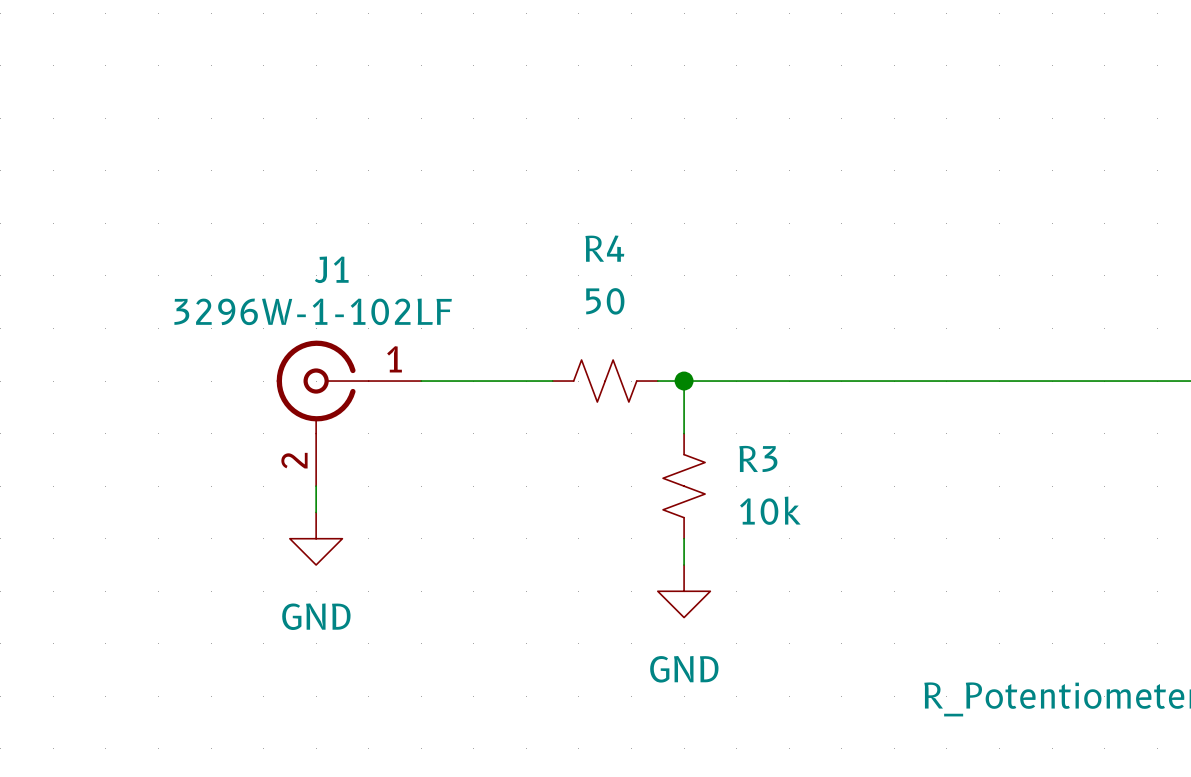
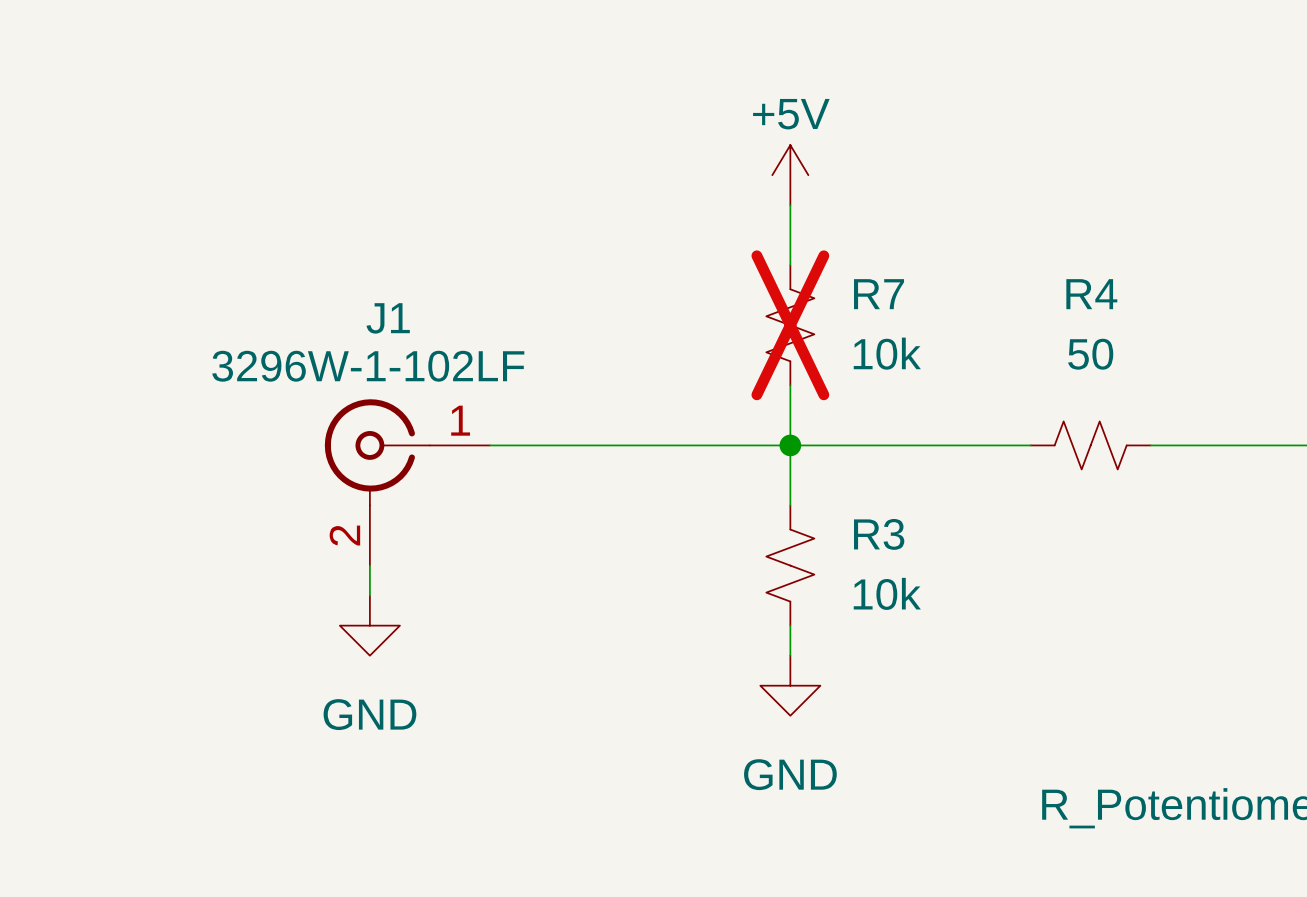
power symbol: none -> +5V (790, 175)
wire: none -> (790, 205) (790, 265)
R7: none -> 10k (790, 325)
wire: none -> (790, 385) (790, 445)
R4 position: (605, 381) -> (1090, 445)
wire: (894, 381) (999, 381) -> (640, 445) (760, 445)

